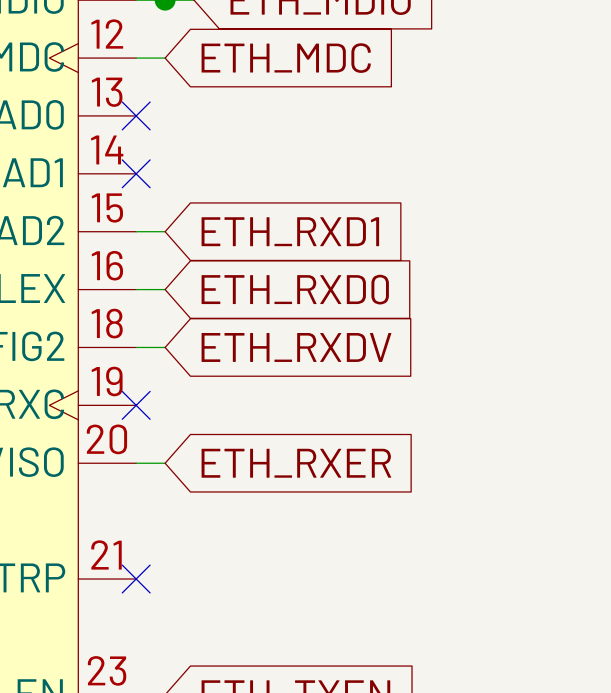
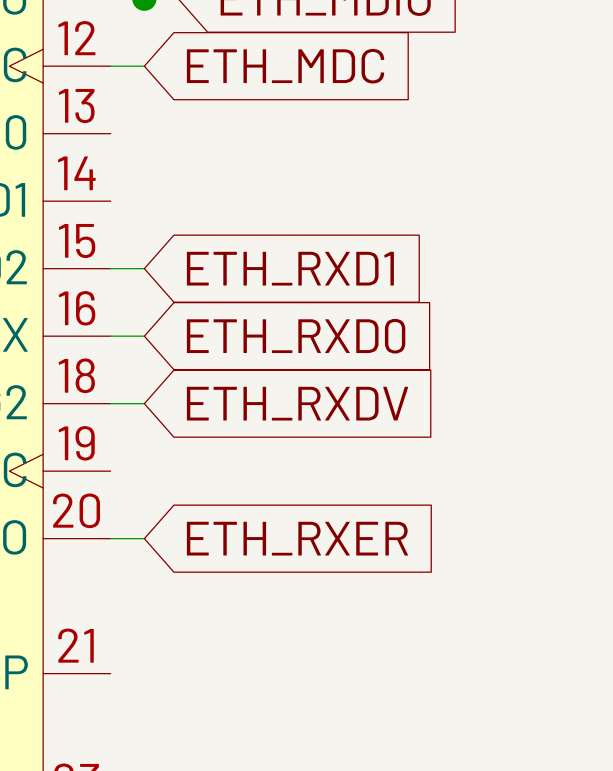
no-connect mark: (136, 115) -> none
no-connect mark: (136, 173) -> none
no-connect mark: (136, 405) -> none
no-connect mark: (136, 579) -> none

